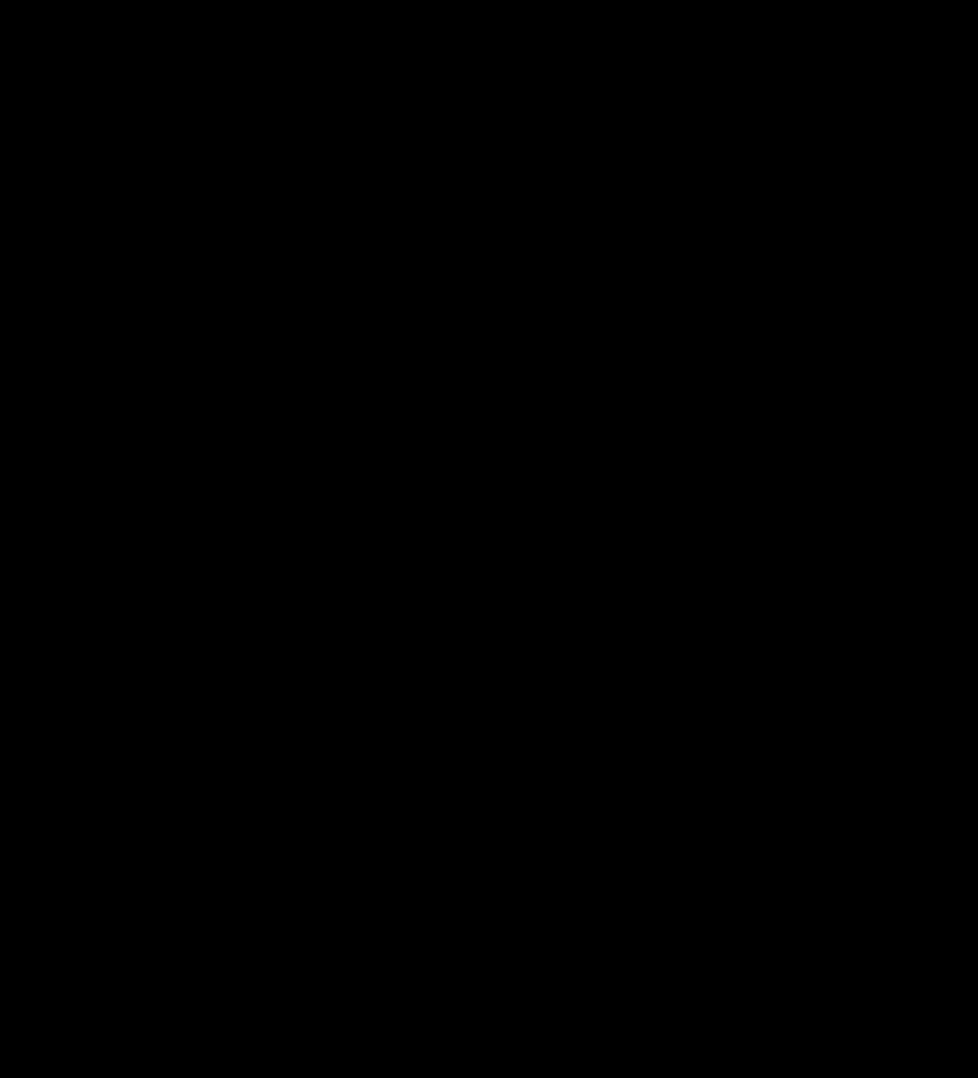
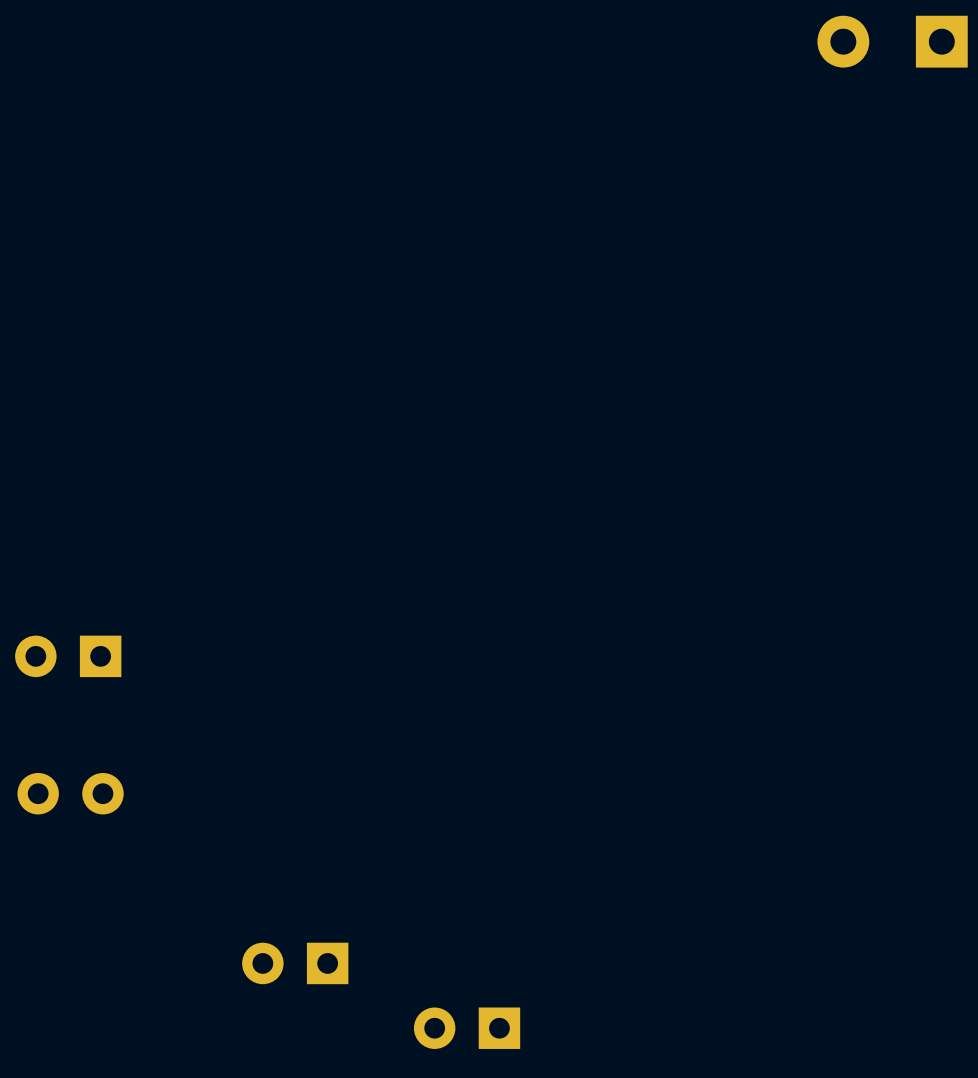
part: none -> (892, 41)
part: none -> (68, 656)
part: none -> (70, 793)
part: none -> (295, 963)
part: none -> (467, 1028)

